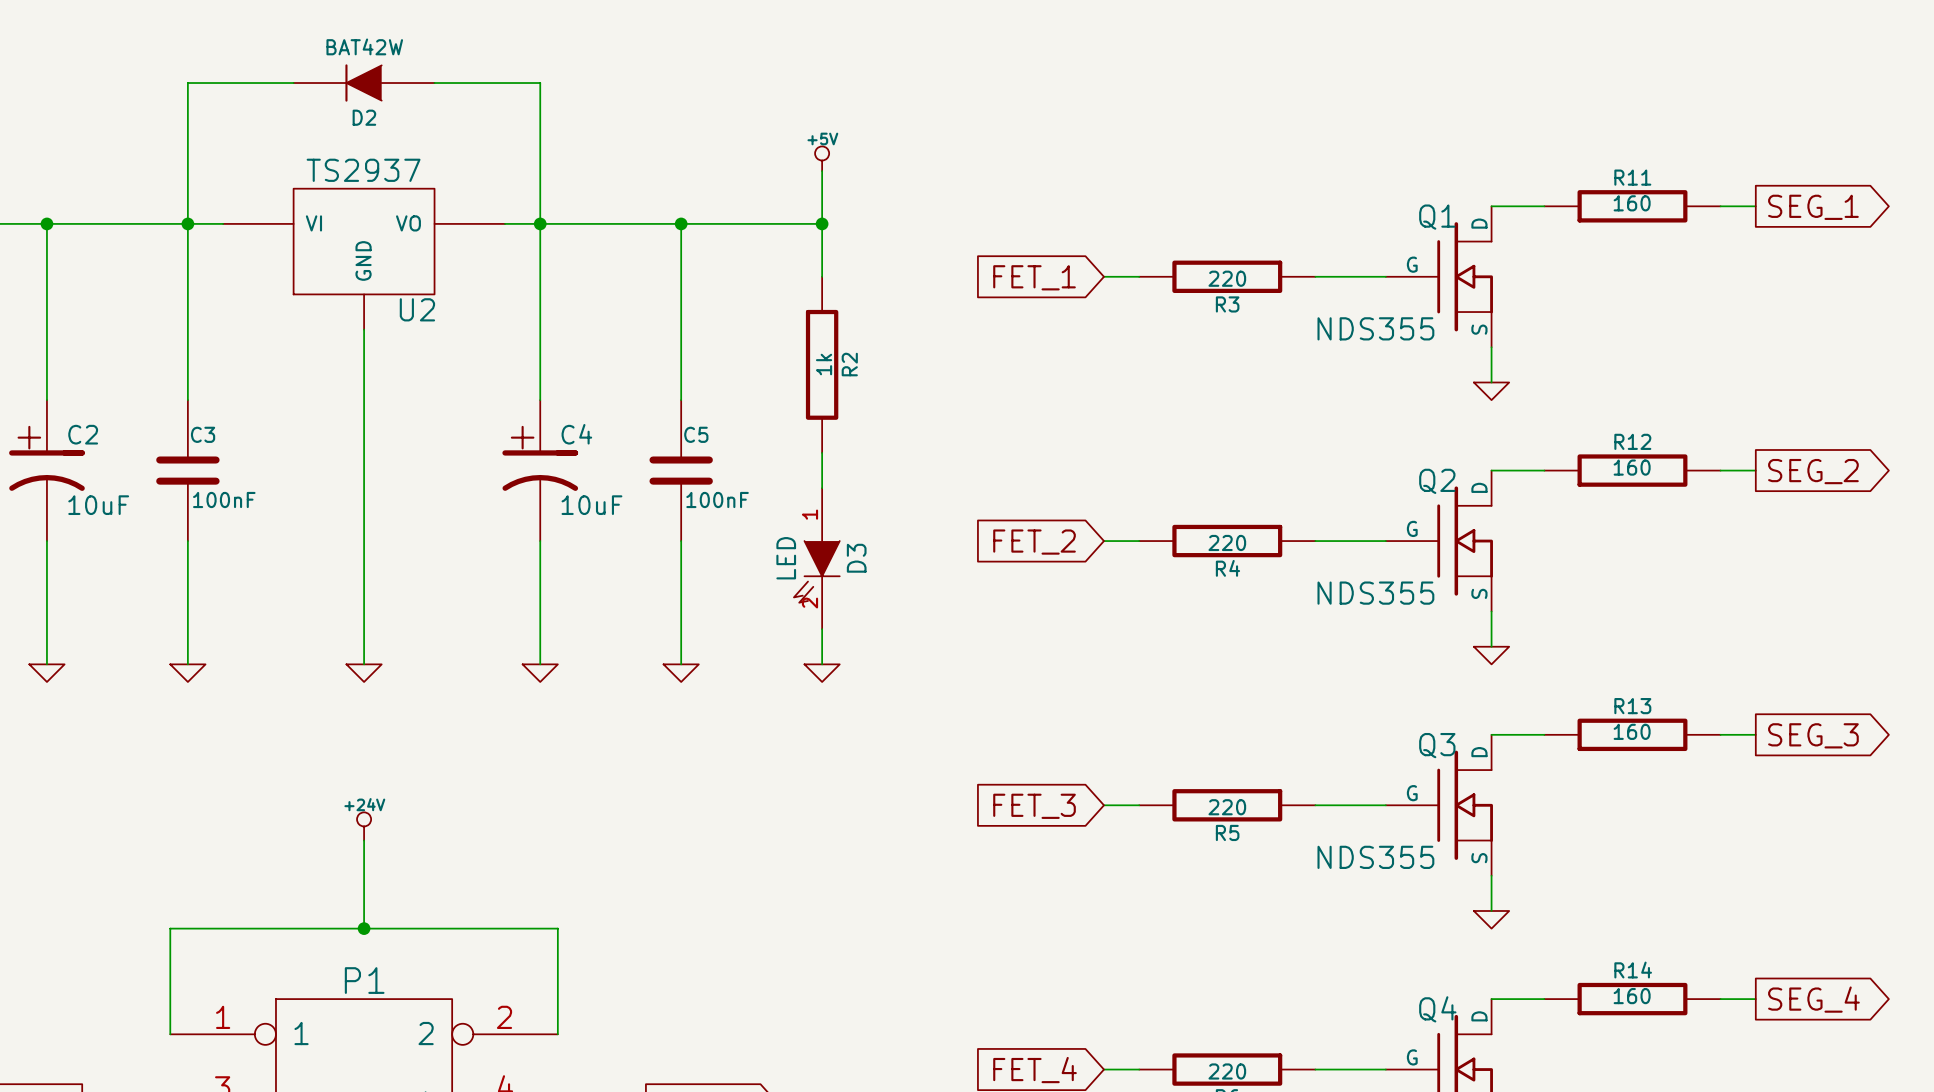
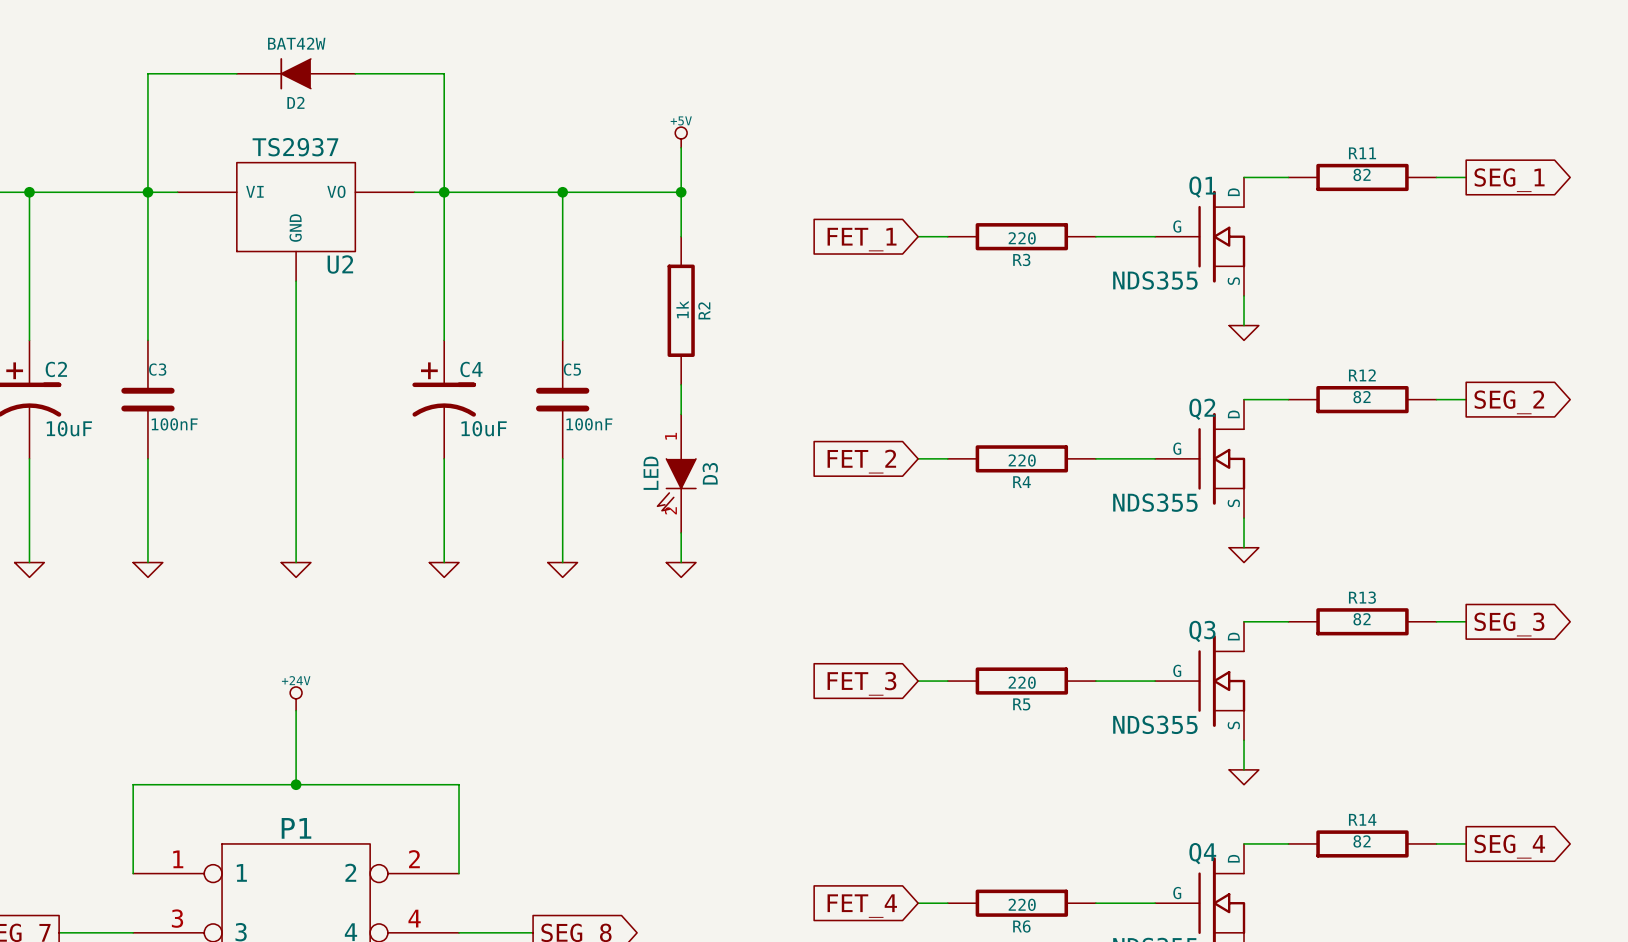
R11 value: 160 (1632, 203) -> 82 (1362, 174)
R12 value: 160 (1632, 467) -> 82 (1362, 397)
R13 value: 160 (1632, 731) -> 82 (1362, 619)
R14 value: 160 (1632, 996) -> 82 (1362, 841)

